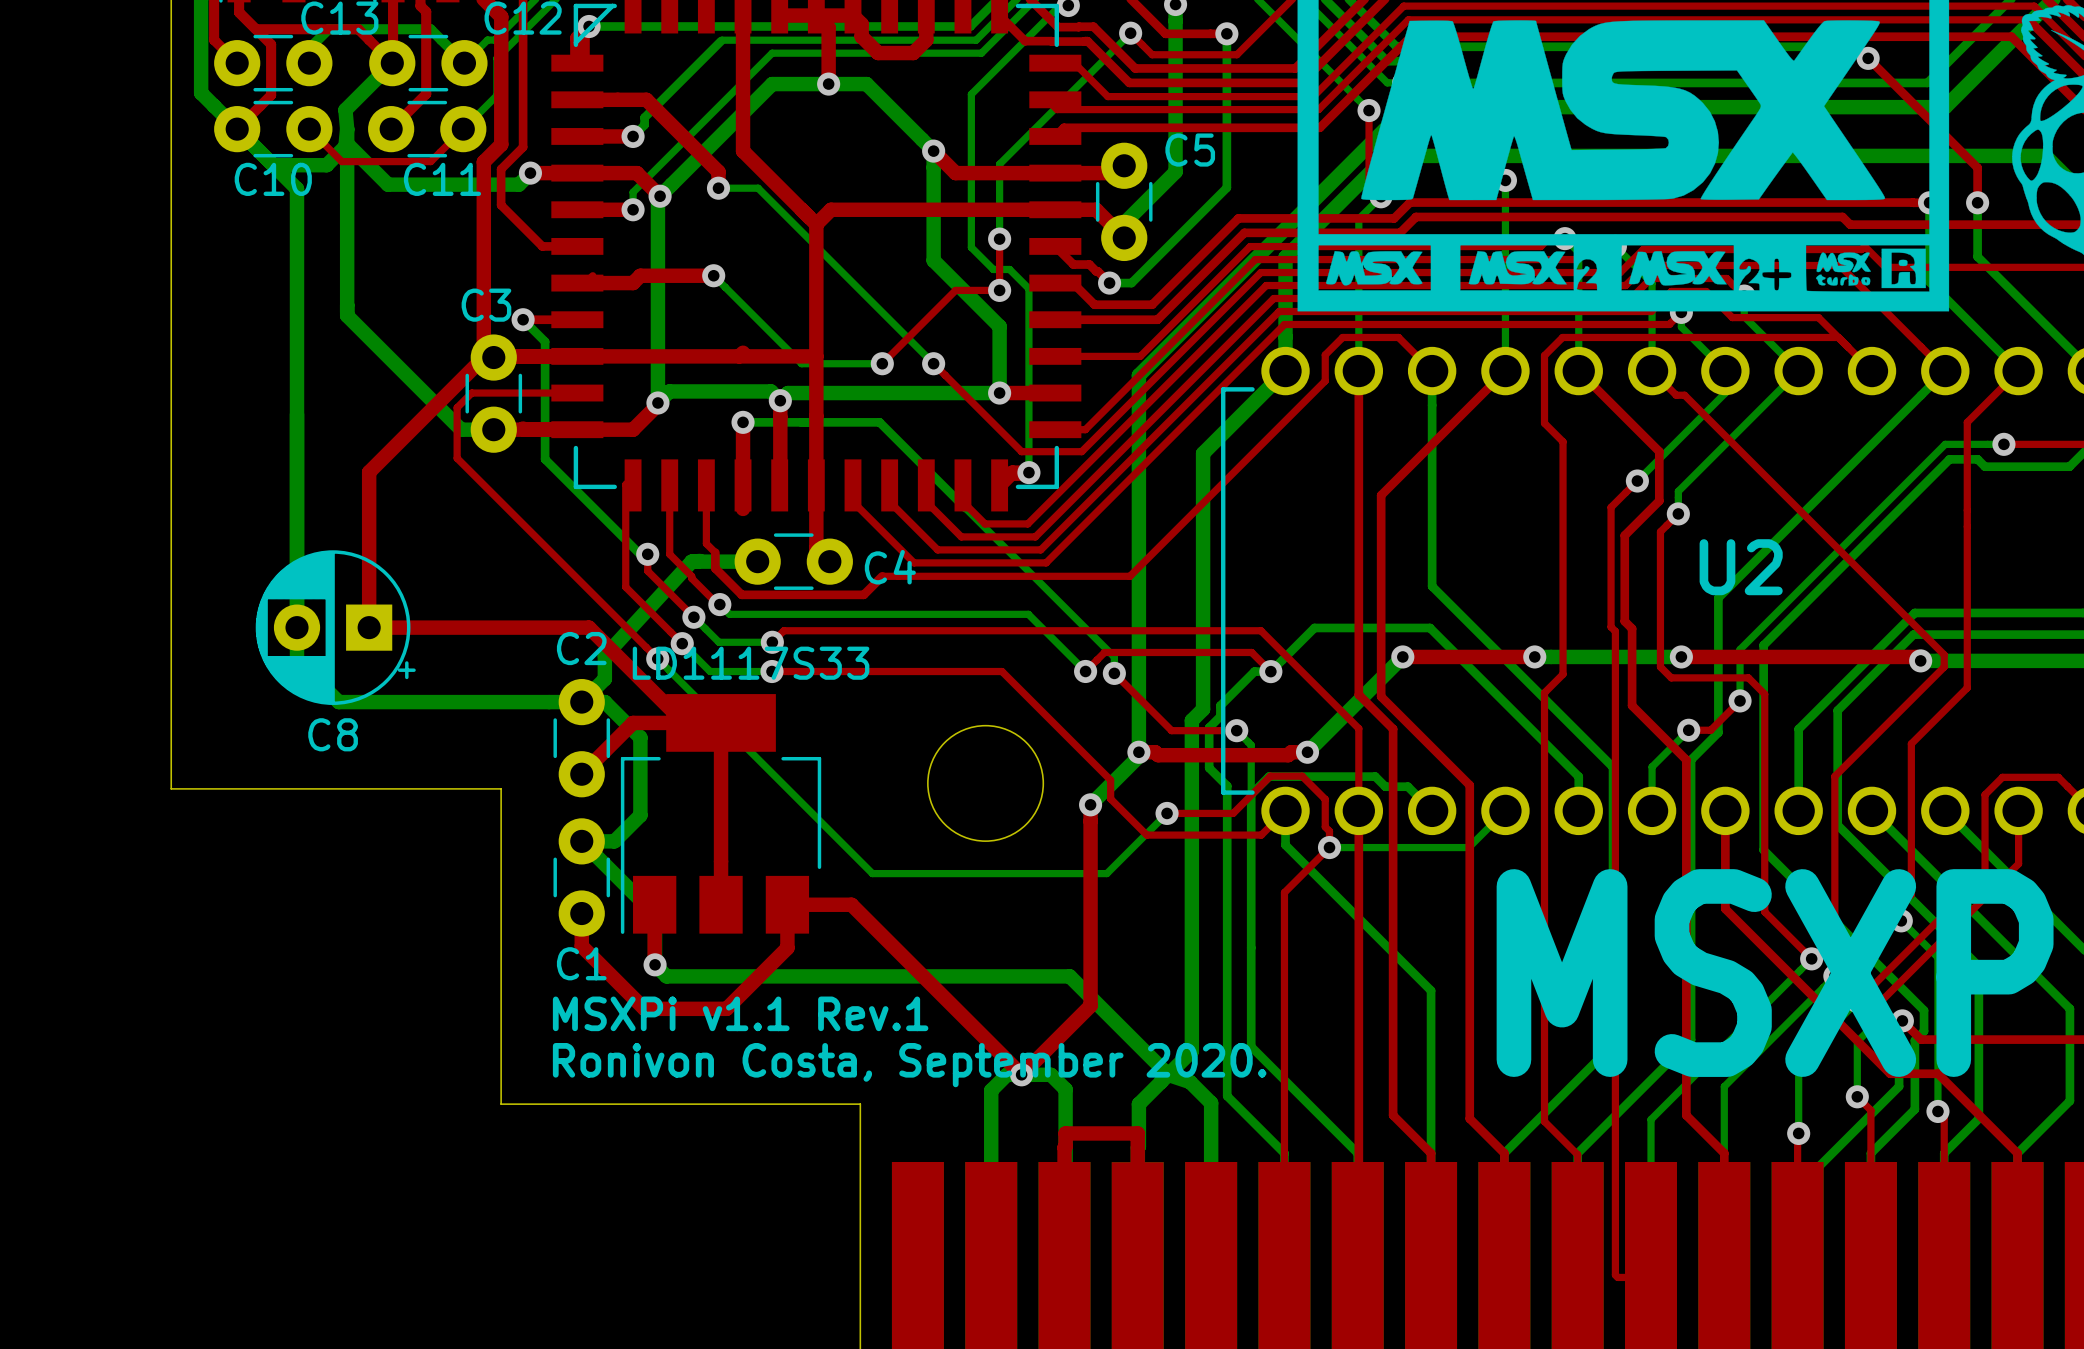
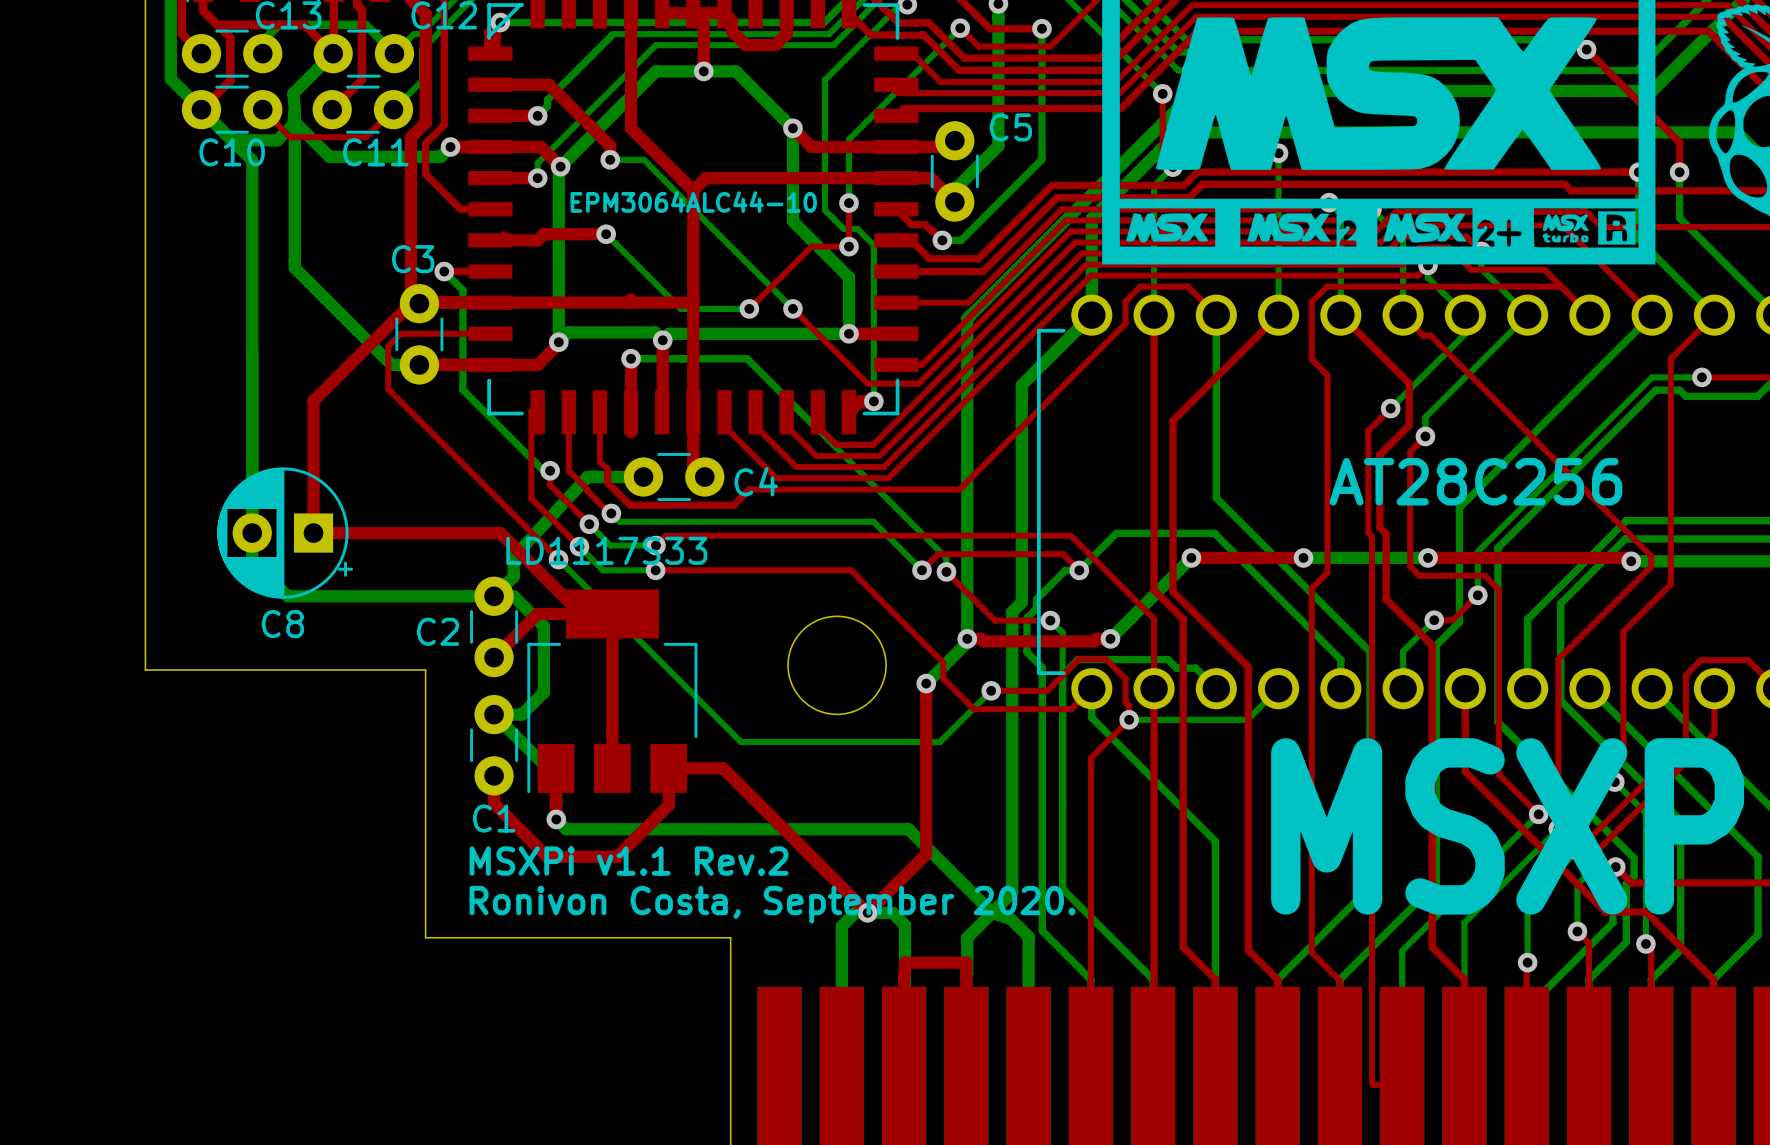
part value: none -> EPM3064ALC44-10 (693, 202)
U2 name: U2 (1741, 567) -> AT28C256 (1475, 481)
C2 name position: C2 (581, 648) -> C2 (438, 631)
LD1117S33 name position: LD1117S33 (751, 663) -> LD1117S33 (606, 550)
text: MSXPi v1.1 Rev.1 (740, 1013) -> MSXPi v1.1 Rev.2 (629, 861)

